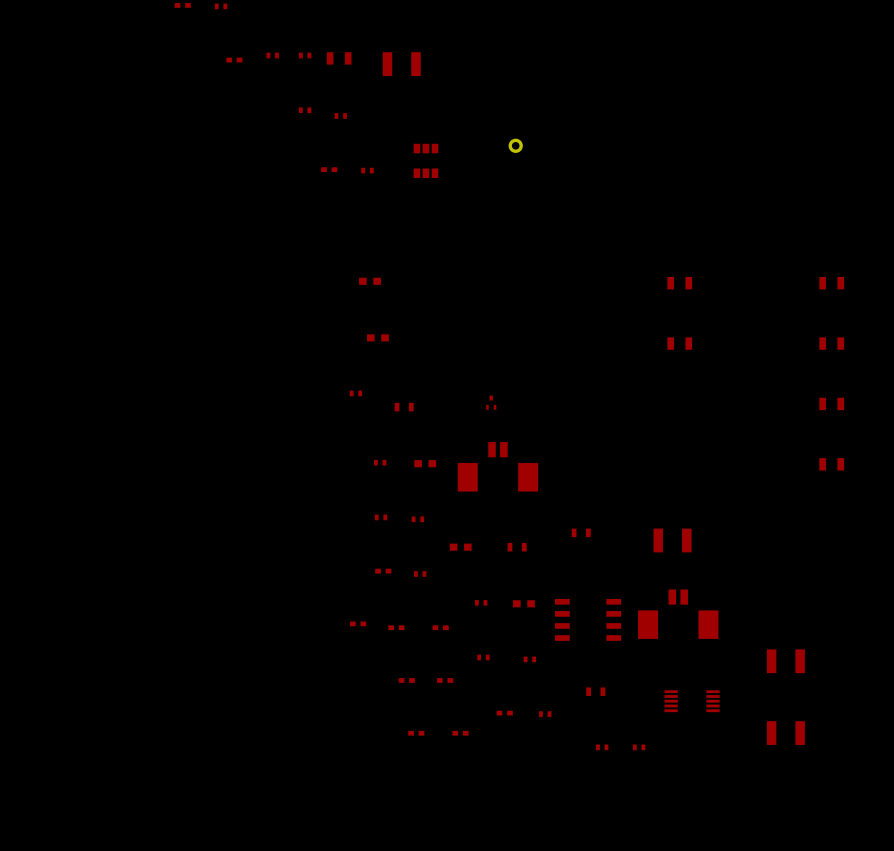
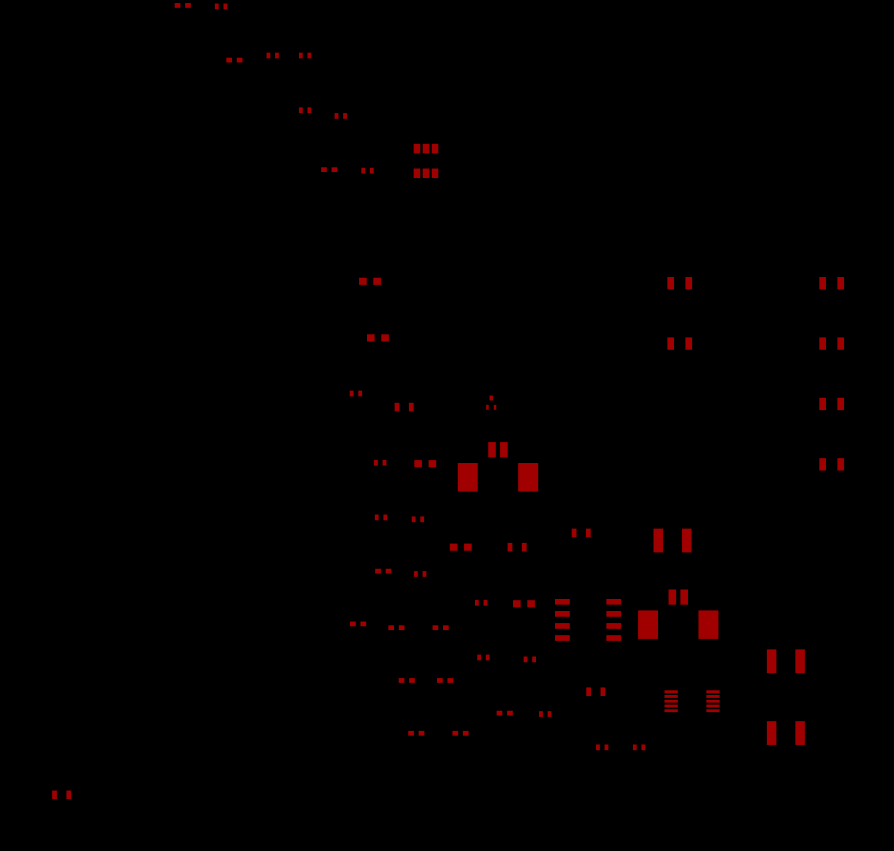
part: (339, 58) -> none
part: (401, 64) -> none
part: (515, 145) -> none
part: none -> (61, 794)

